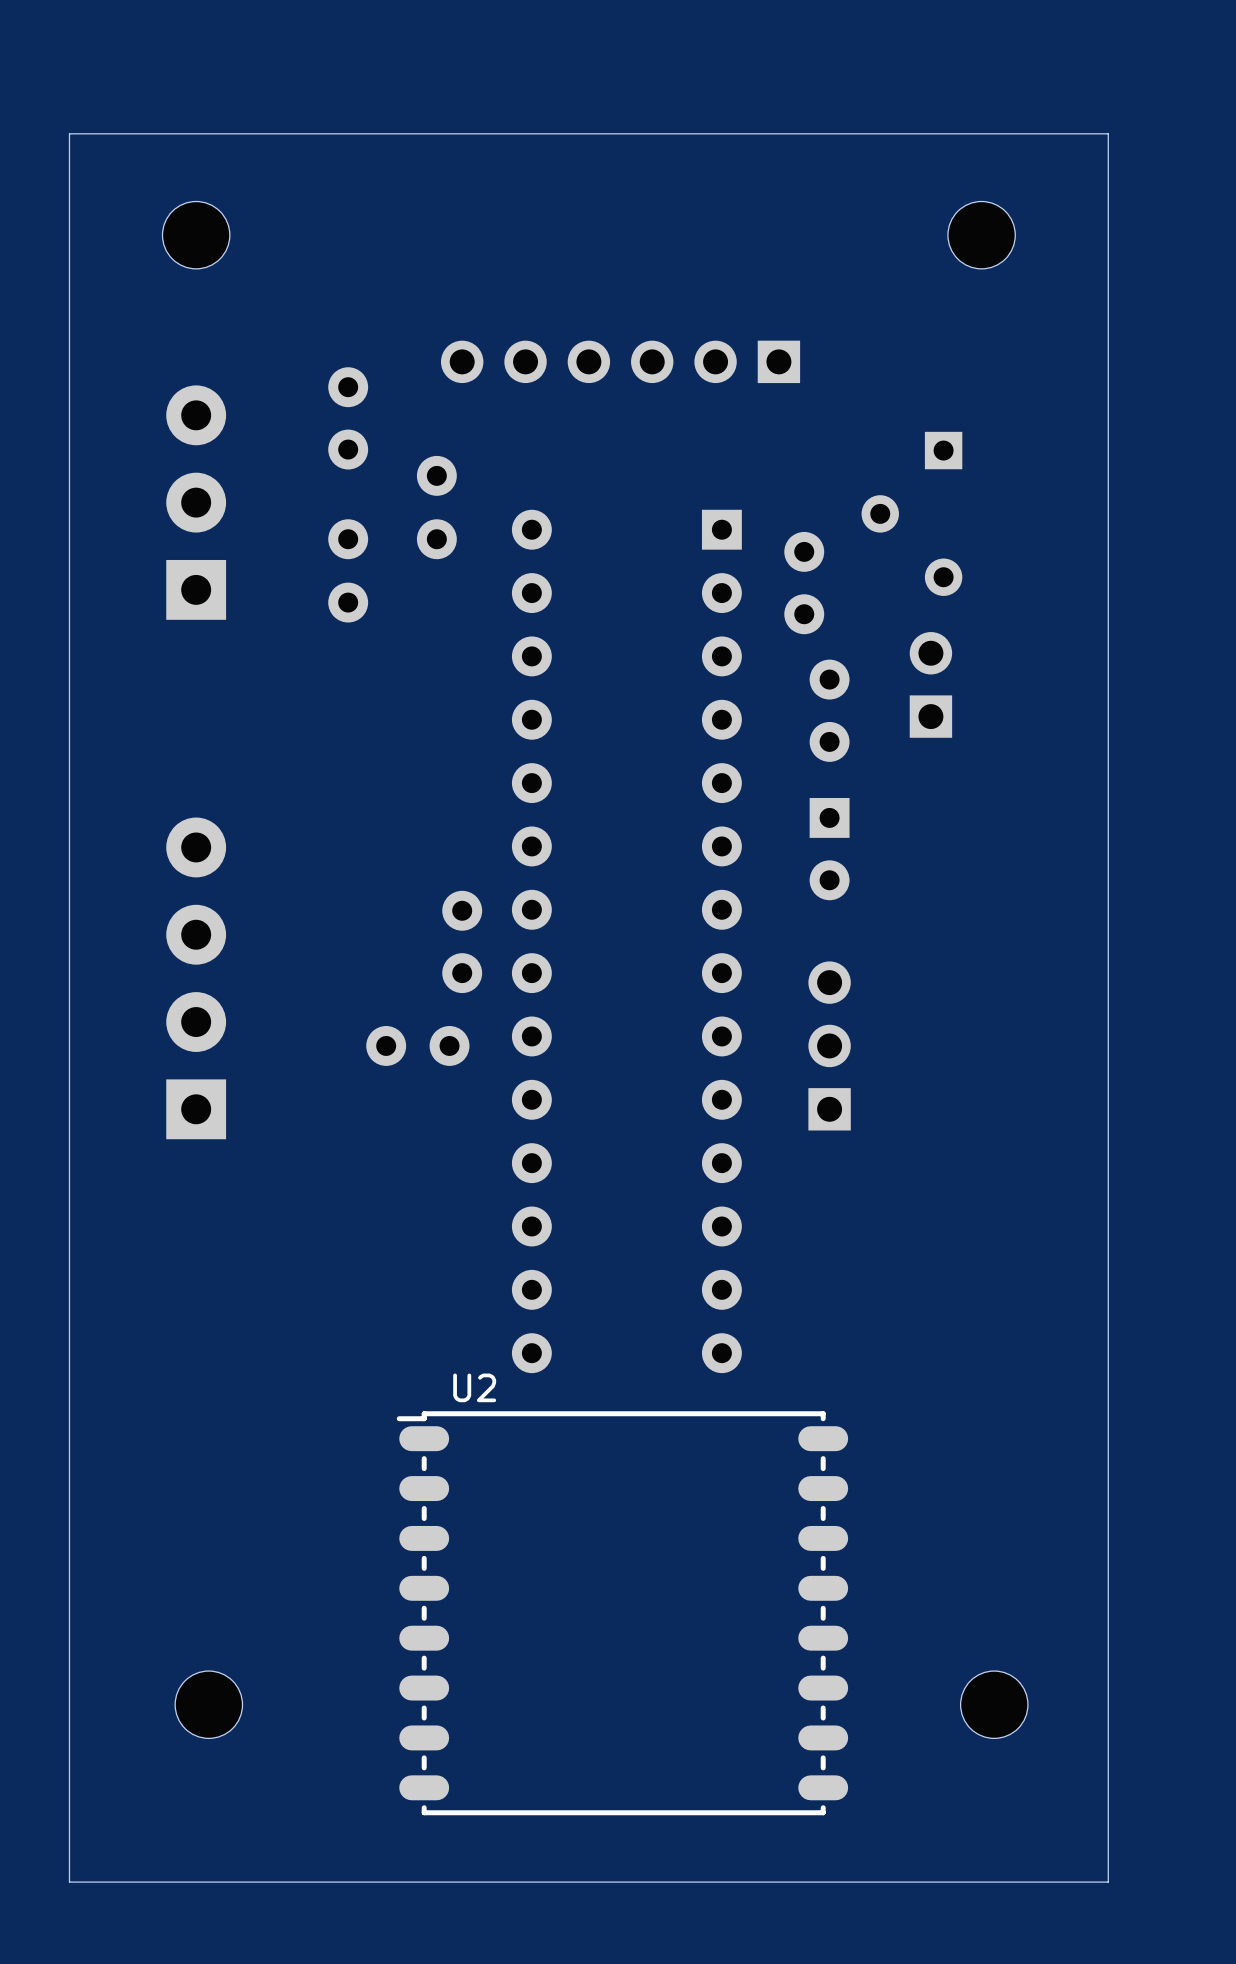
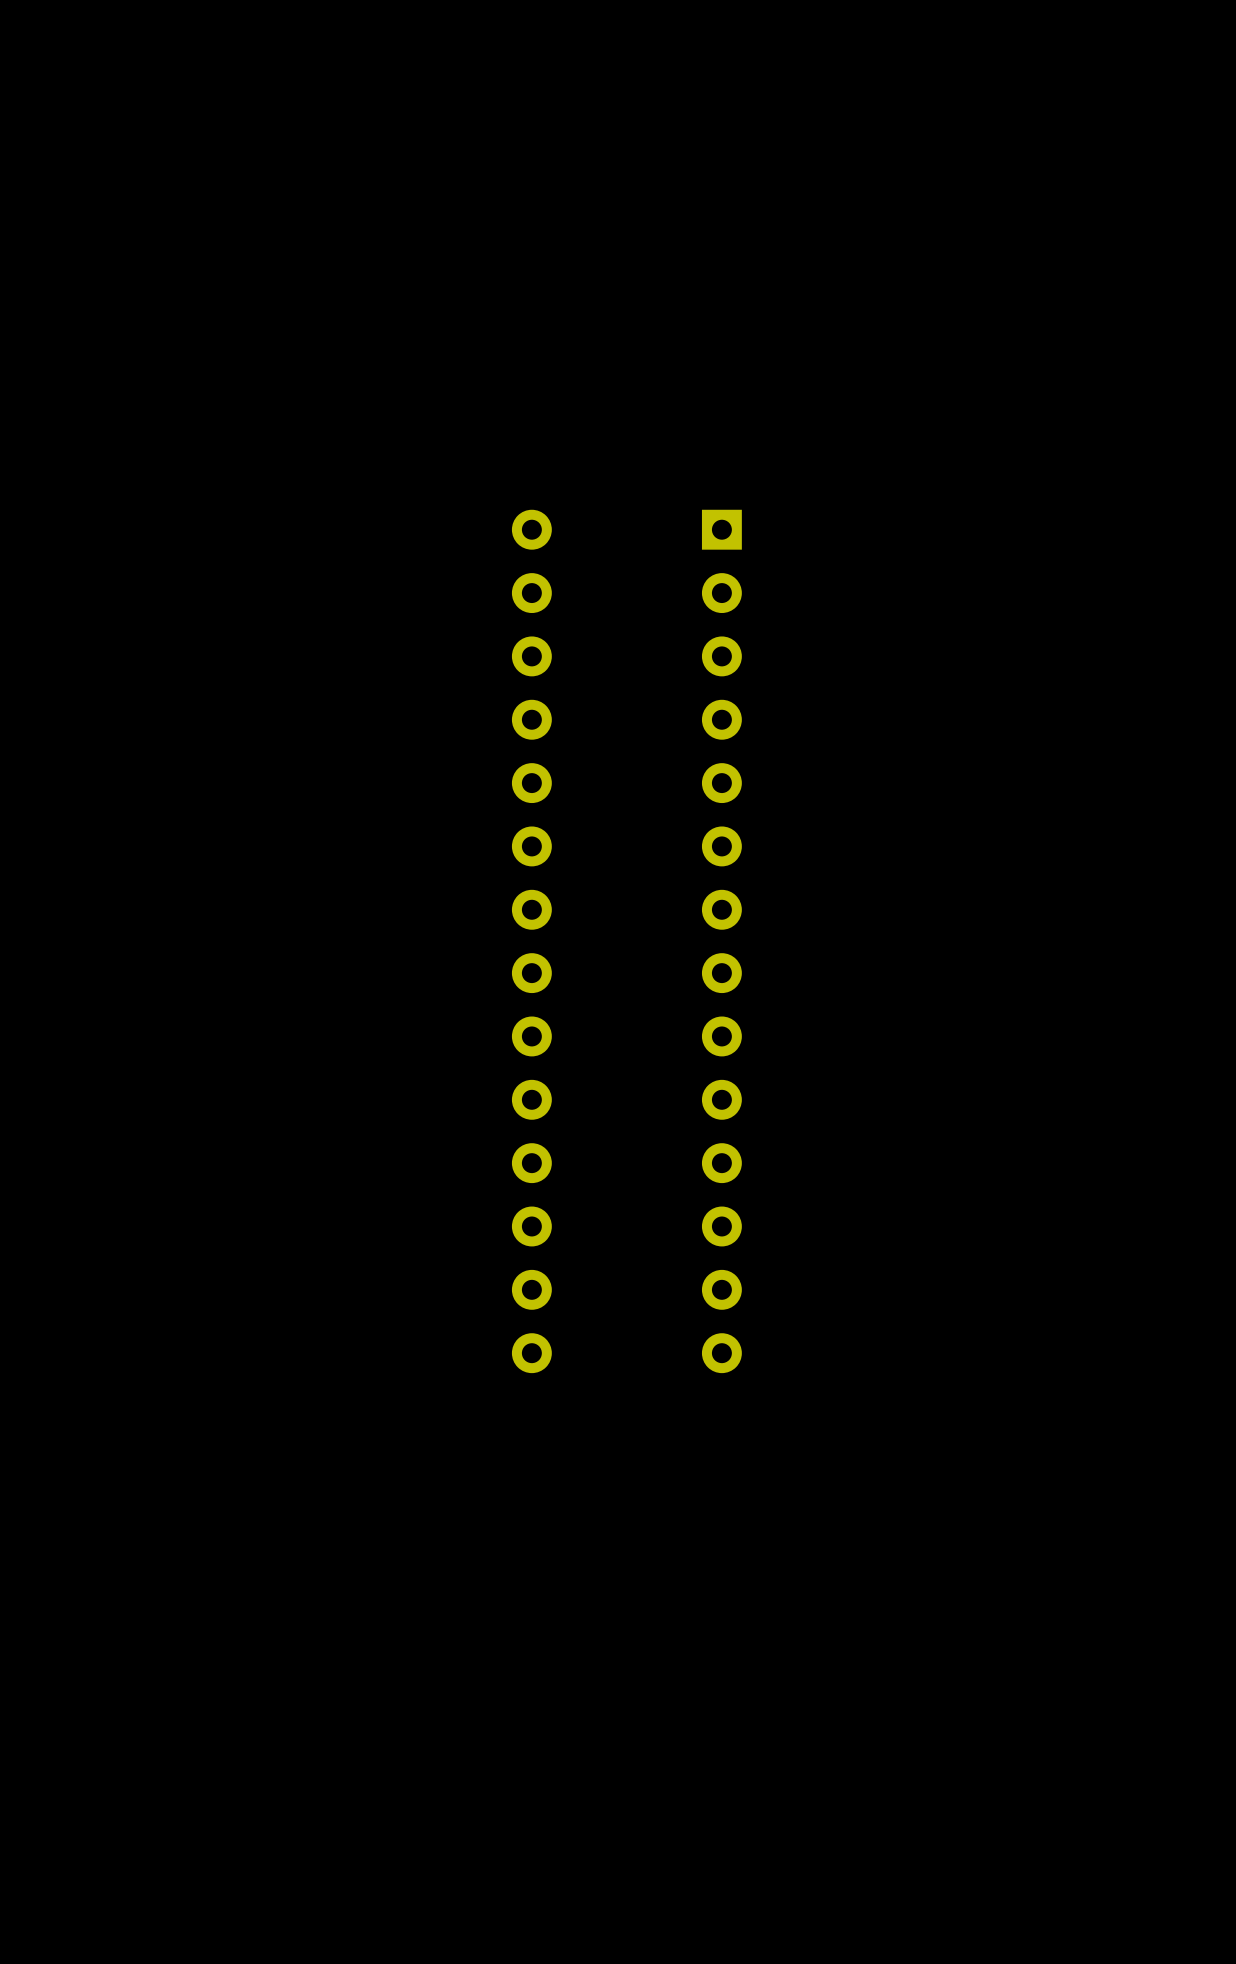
board edge: (1108, 133) (1108, 1882) (69, 1882) (69, 133) (1108, 133) -> none
part: (196, 235) -> none
part: (981, 235) -> none
part: (620, 361) -> none
part: (348, 418) -> none
part: (196, 502) -> none
part: (436, 507) -> none
part: (911, 513) -> none
part: (348, 570) -> none
part: (804, 583) -> none
part: (930, 684) -> none
part: (829, 710) -> none
part: (829, 849) -> none
part: (462, 941) -> none
part: (196, 978) -> none
part: (417, 1045) -> none
part: (829, 1045) -> none
U2: (622, 1613) -> none
part: (208, 1704) -> none
part: (994, 1704) -> none

